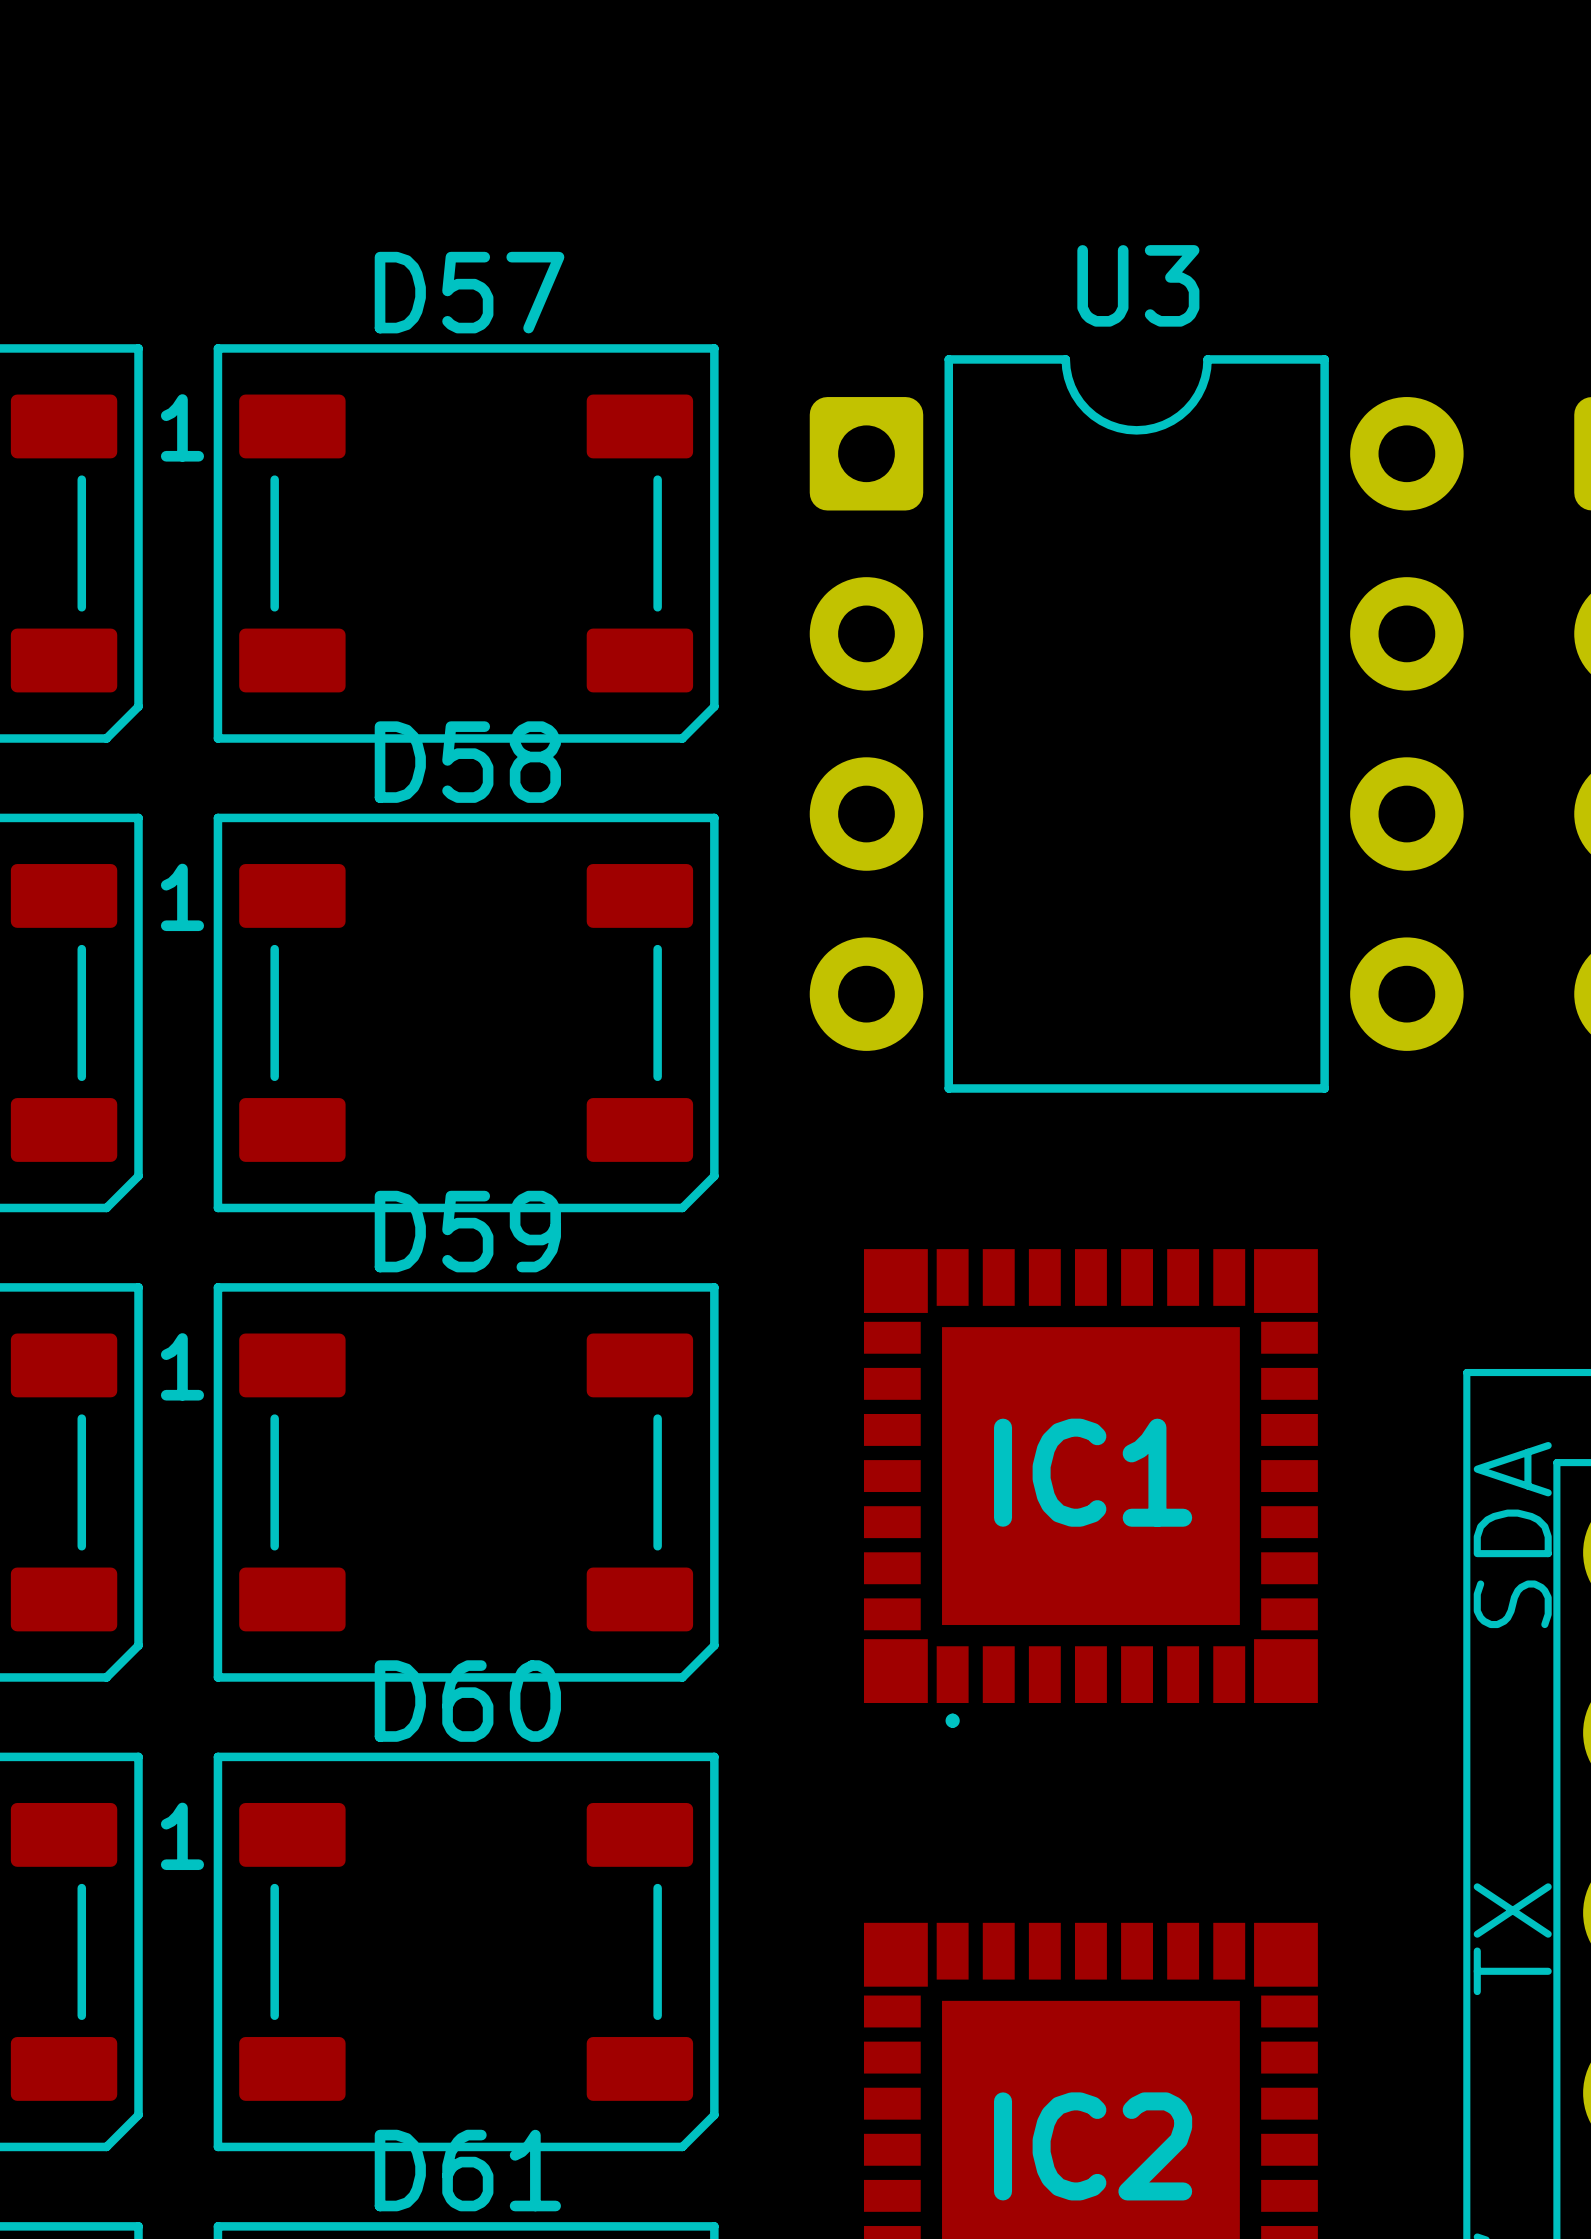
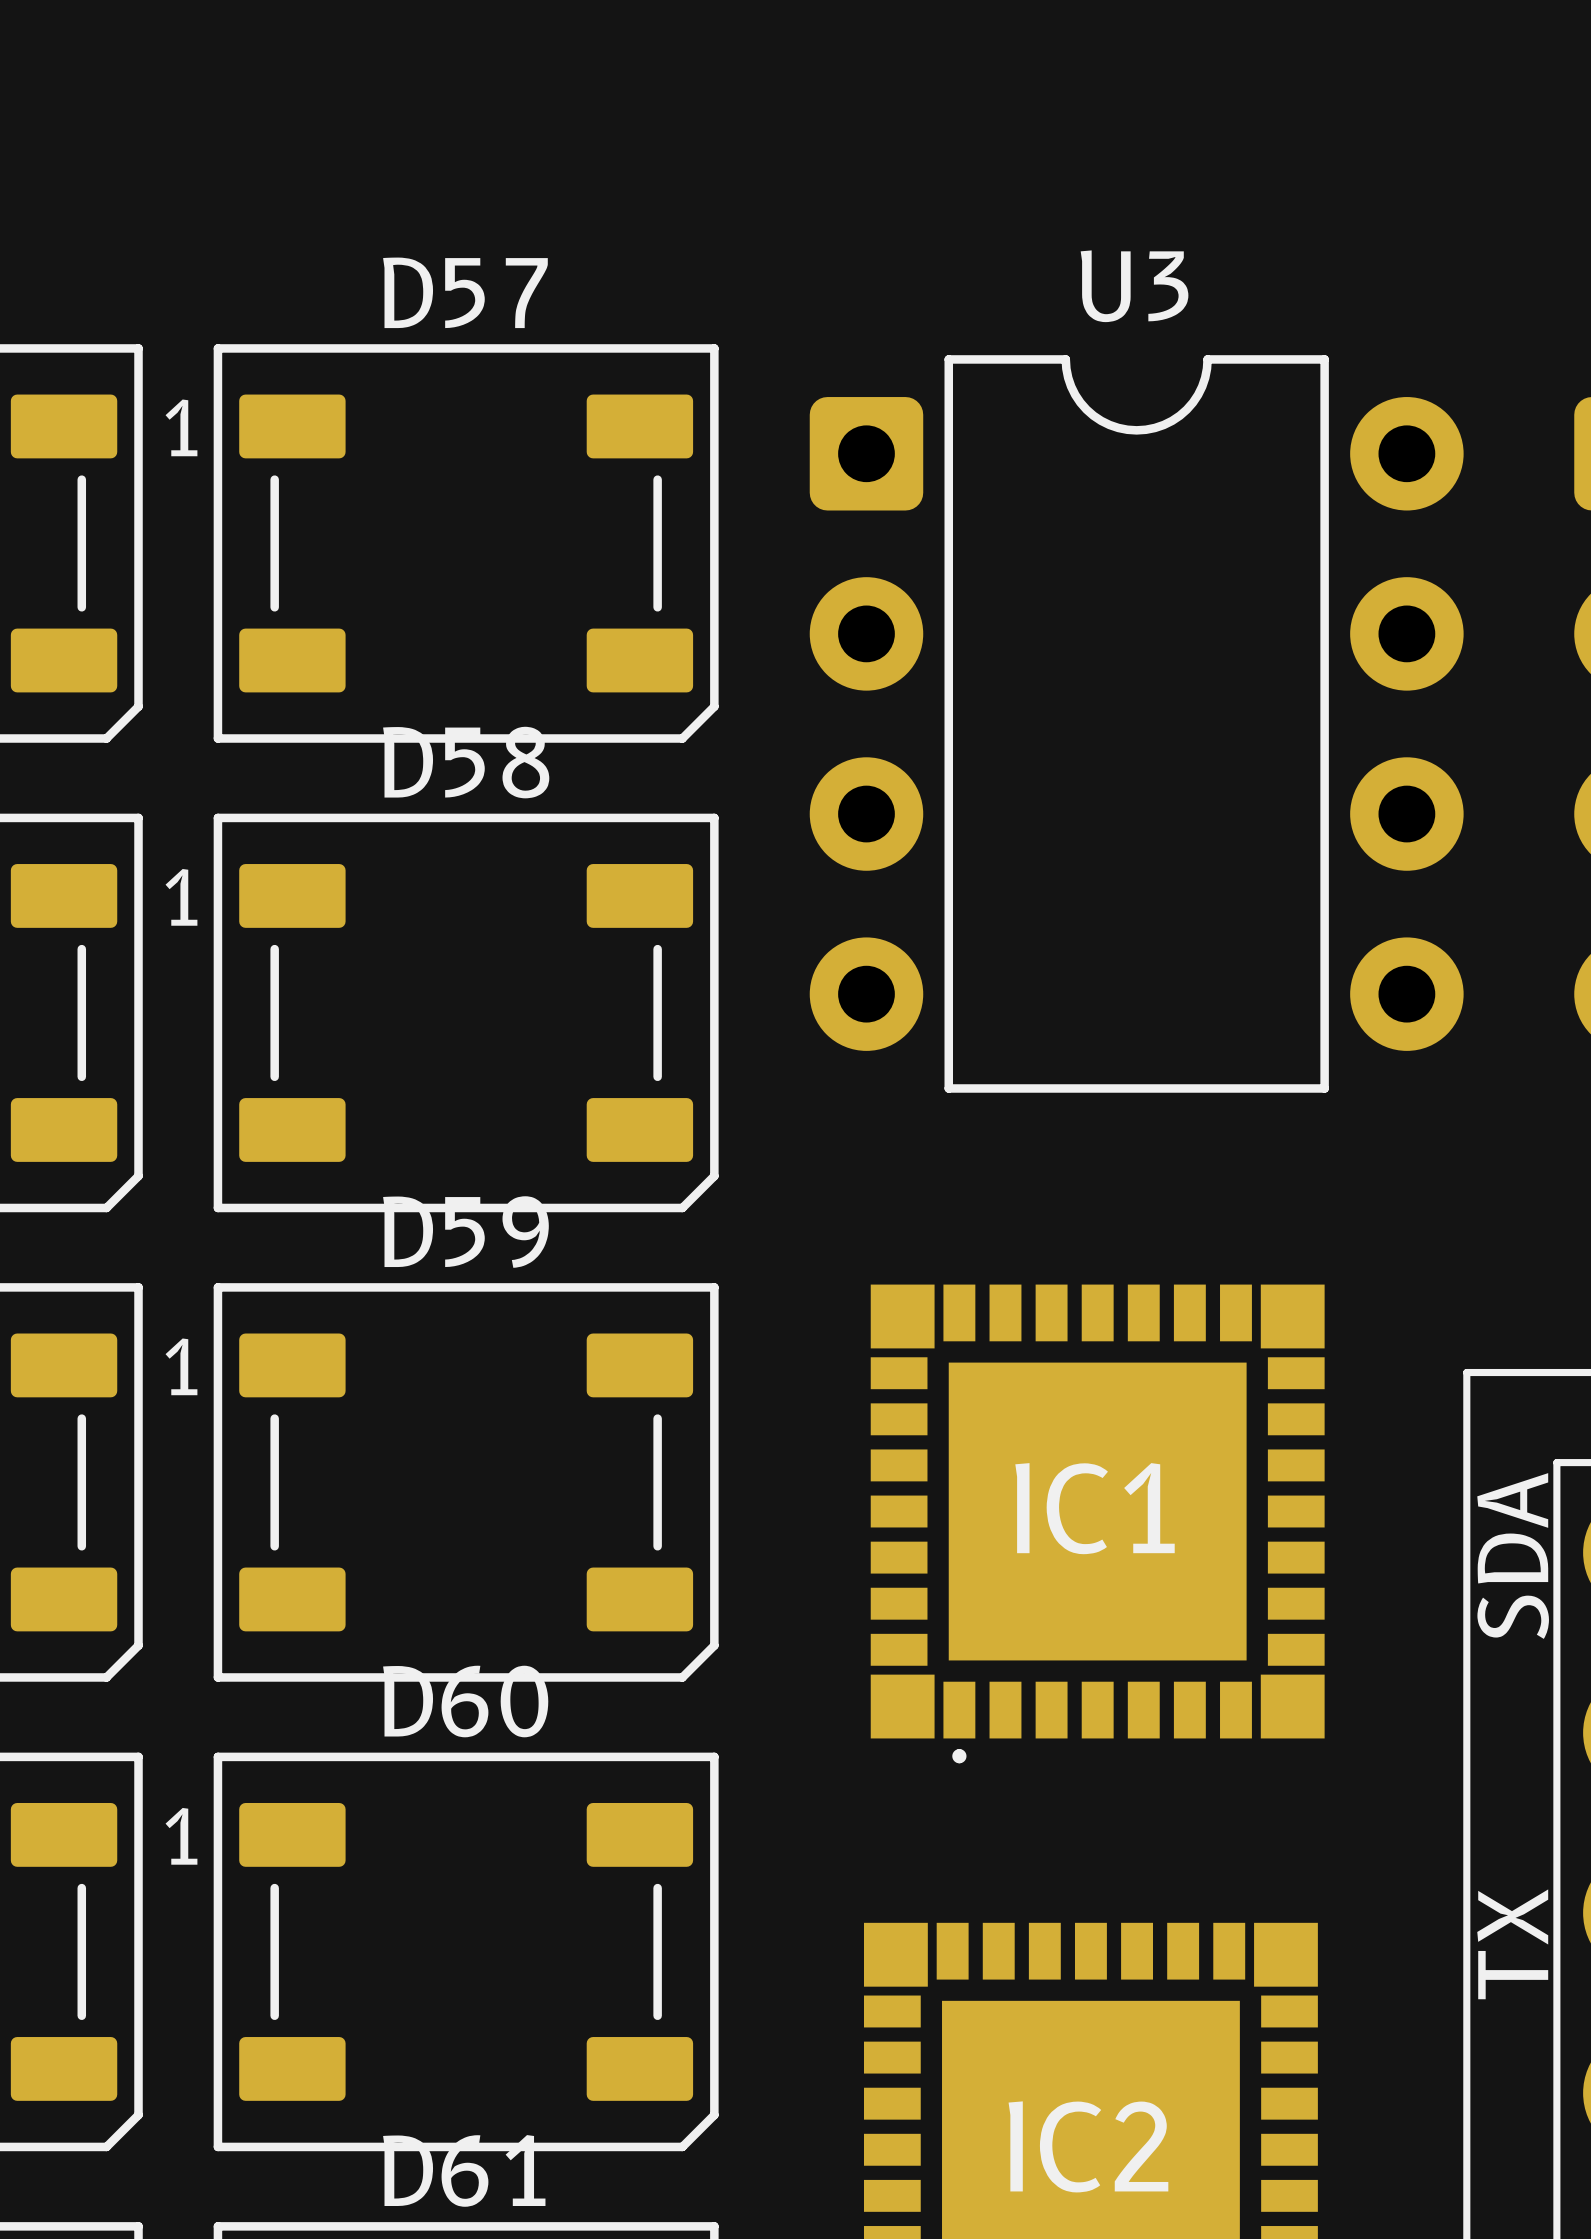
IC1 position: (1090, 1488) -> (1097, 1523)

